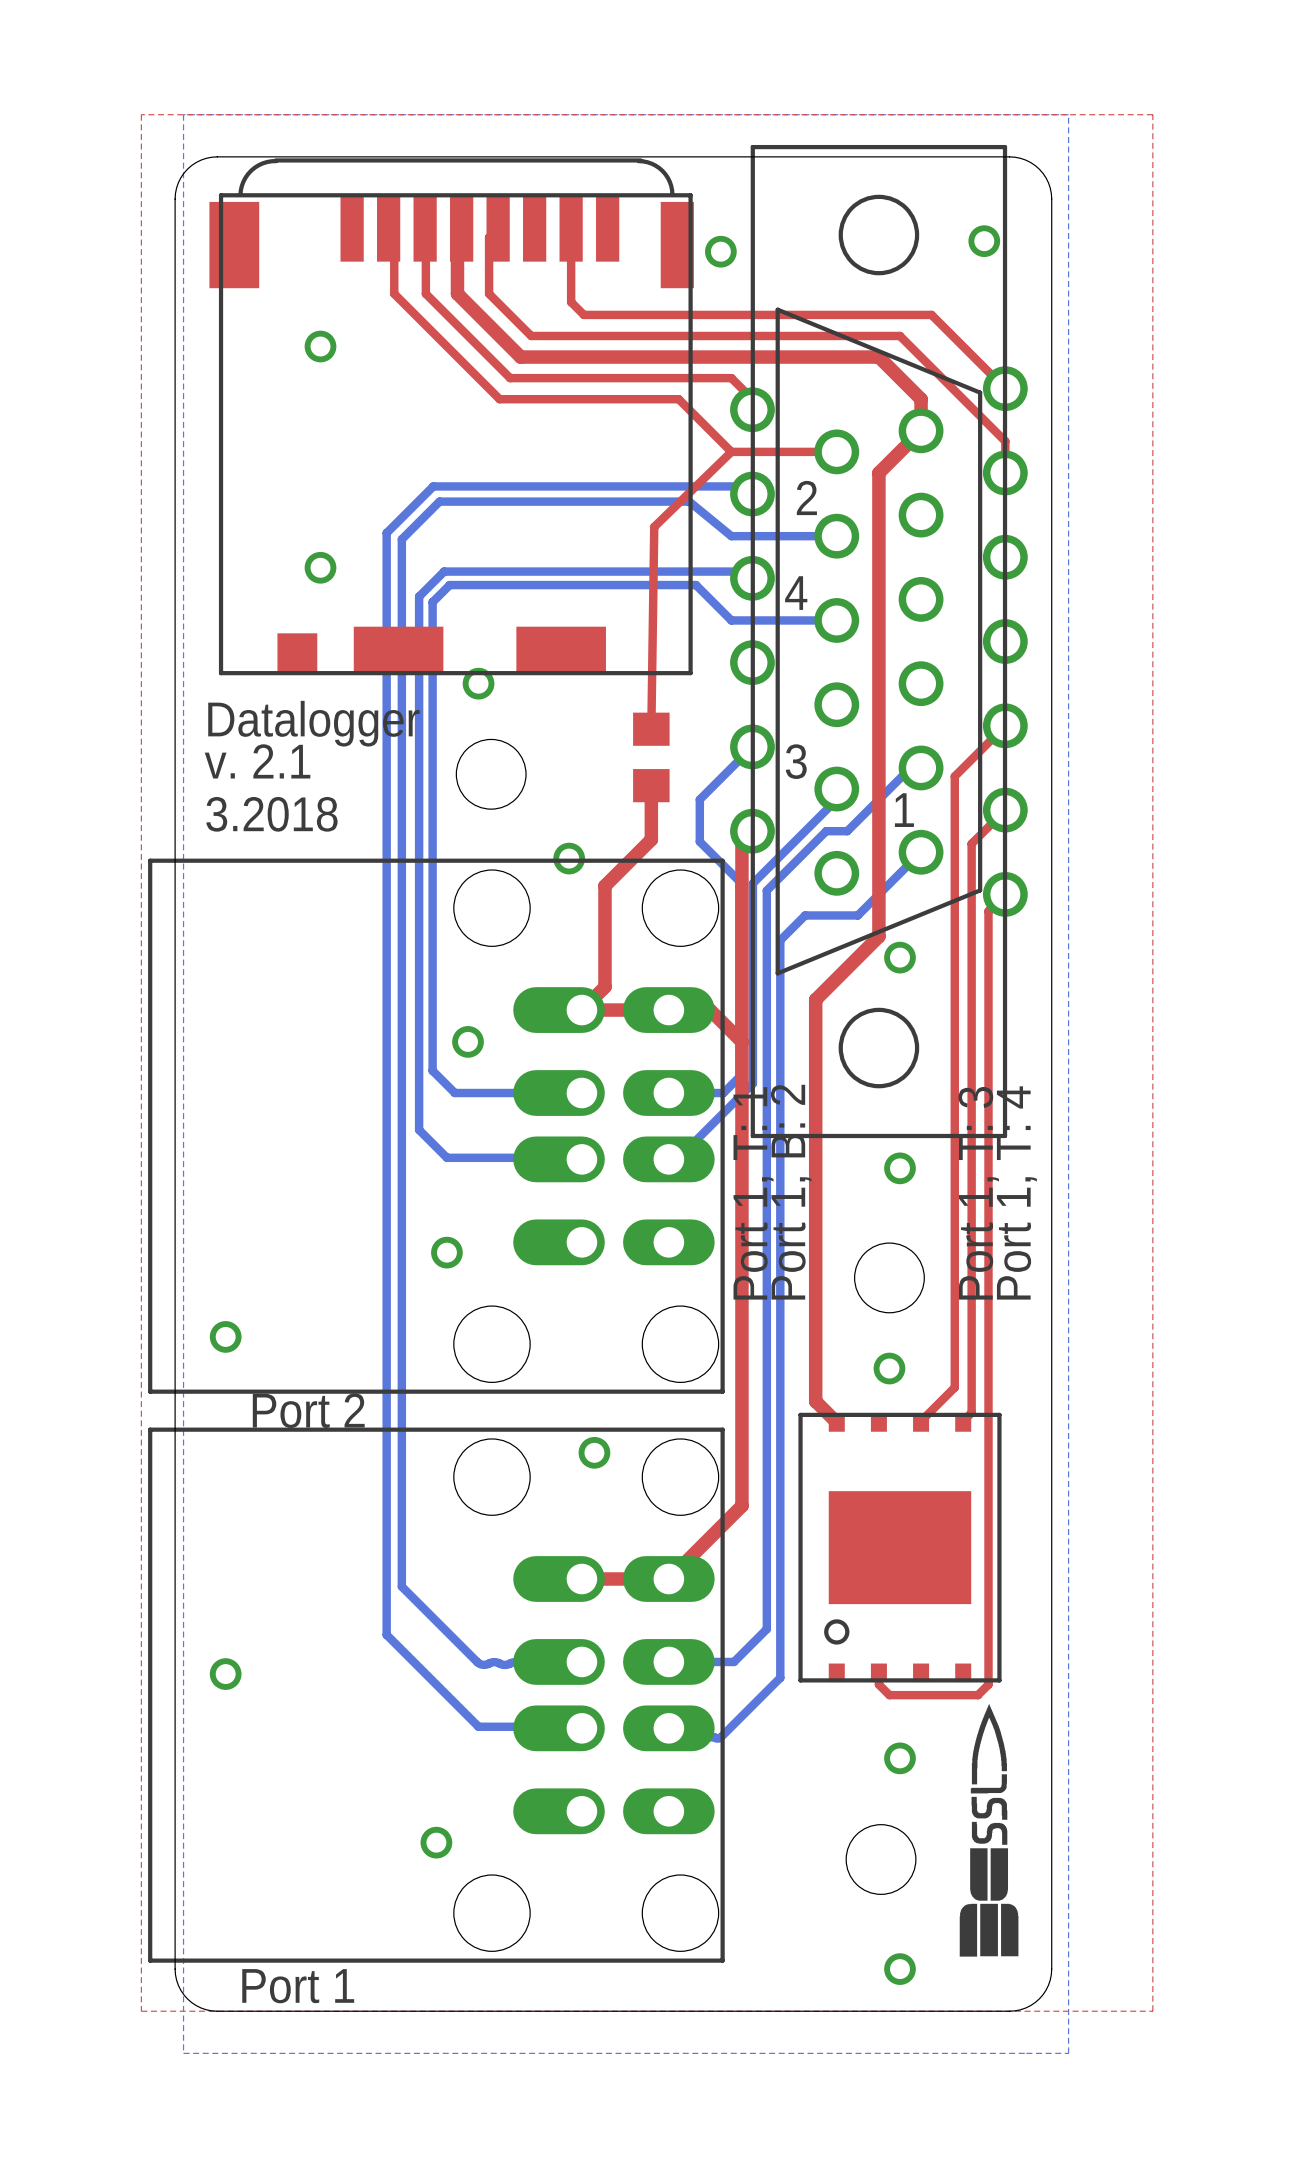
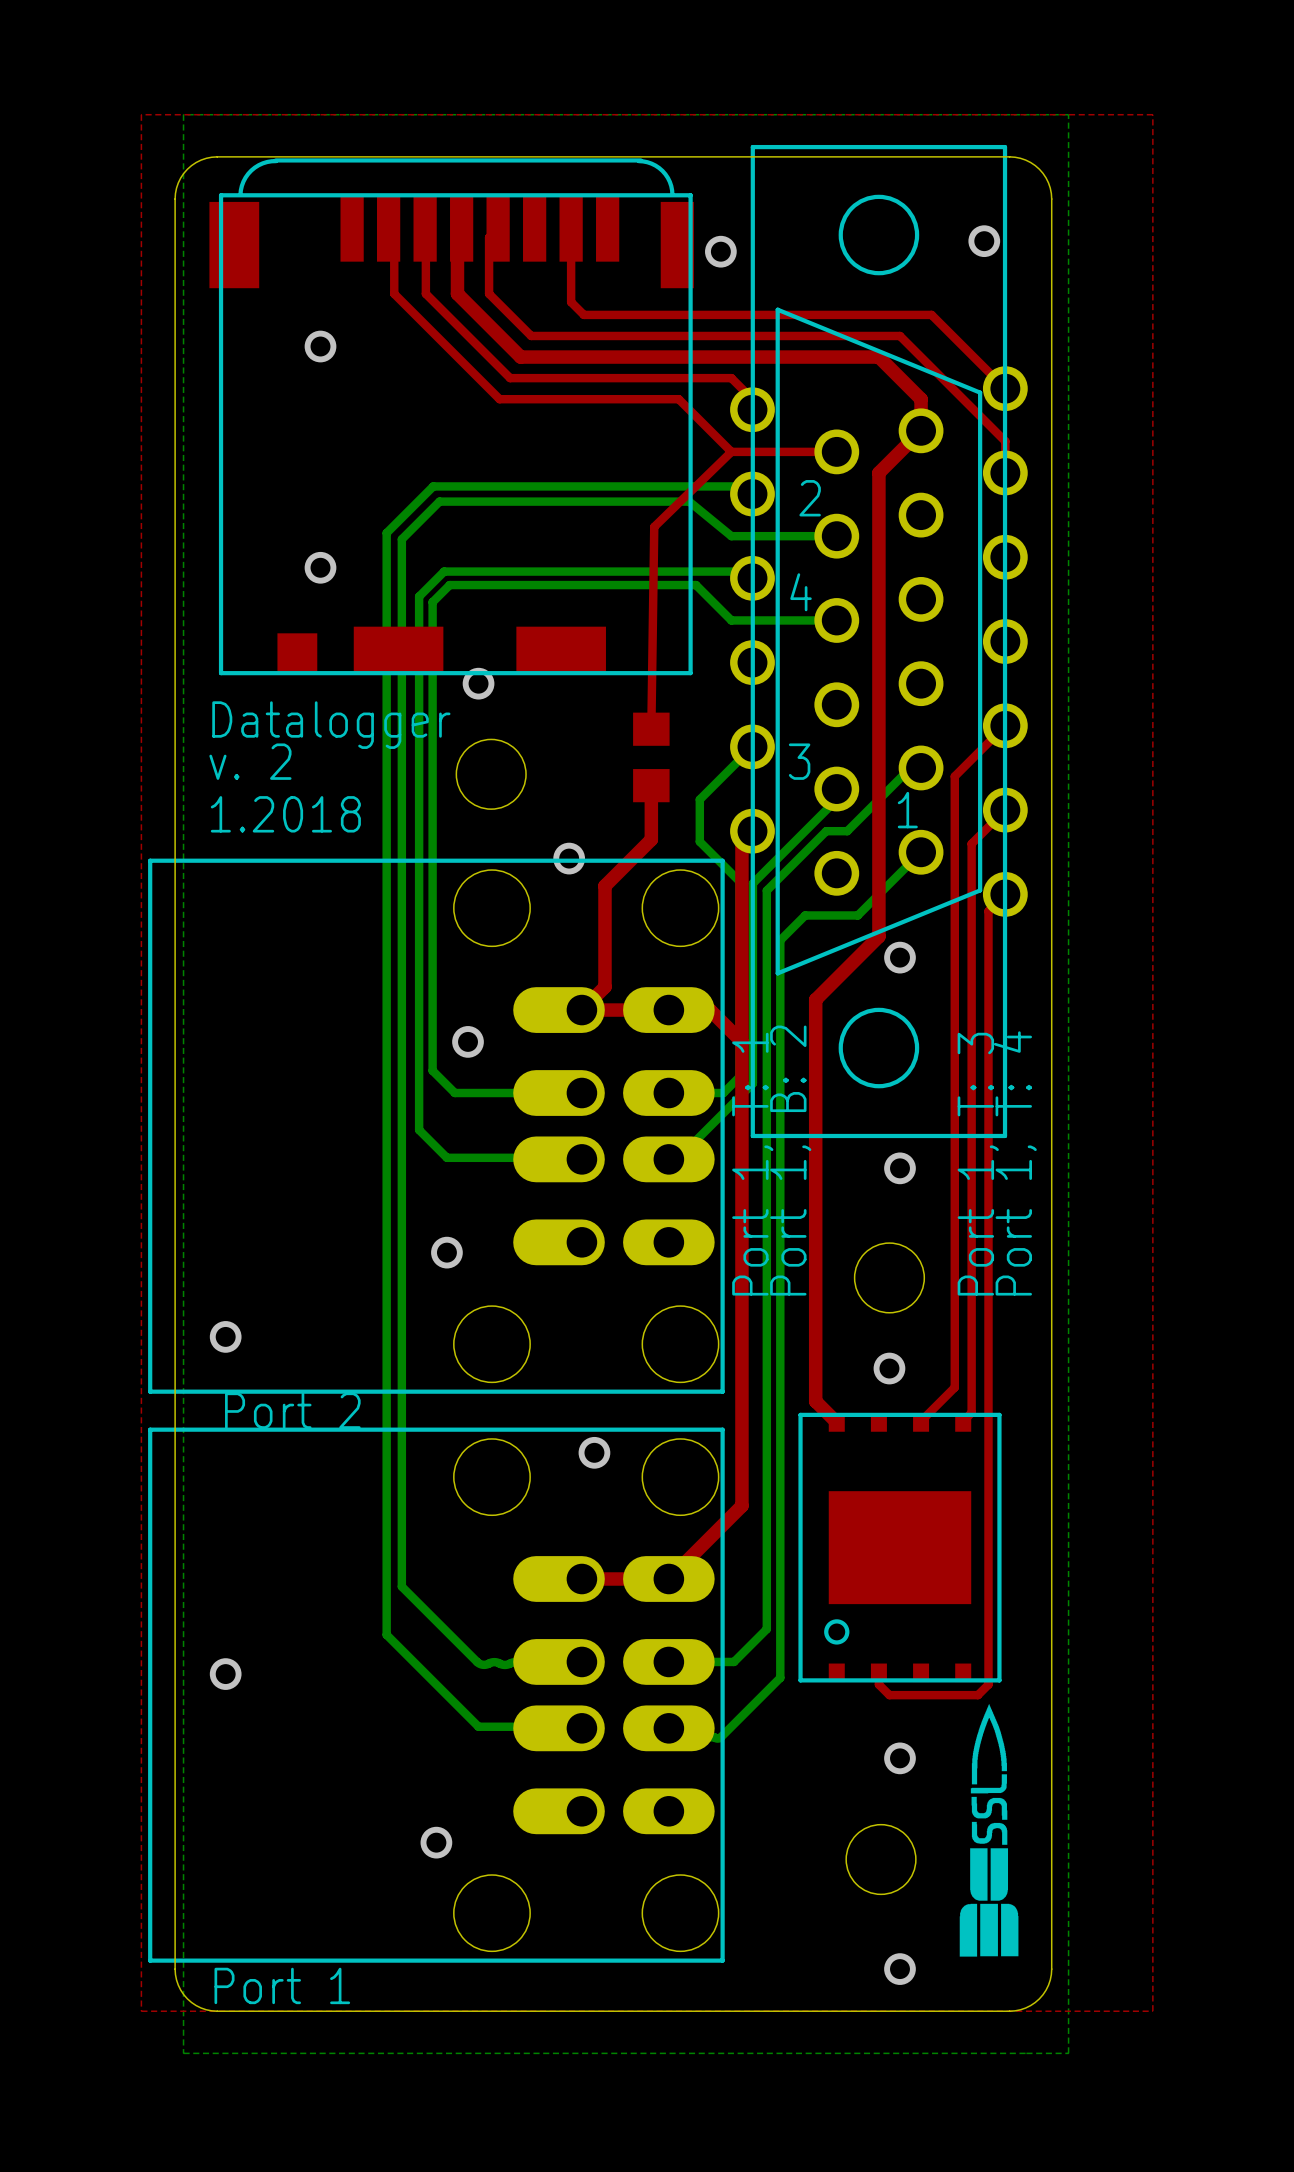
text: v. 2.1 (257, 761) -> v. 2 (250, 761)
text: 3.2018 (271, 814) -> 1.2018 (285, 814)

